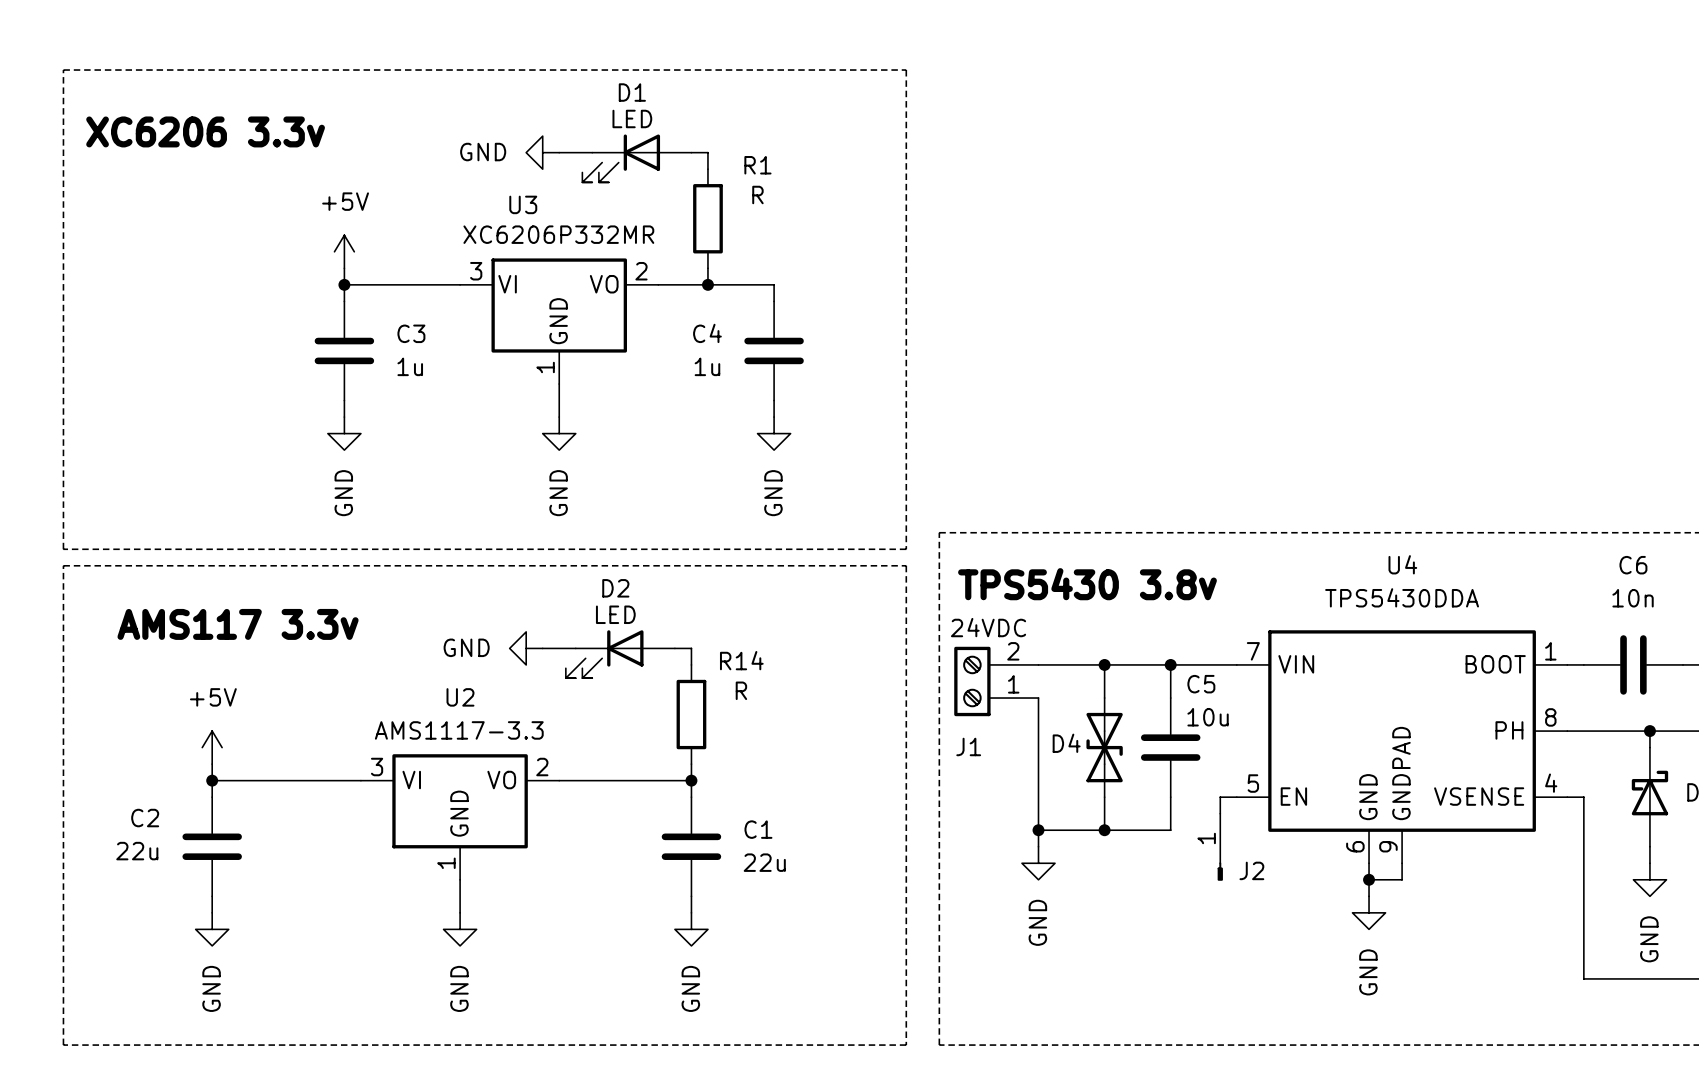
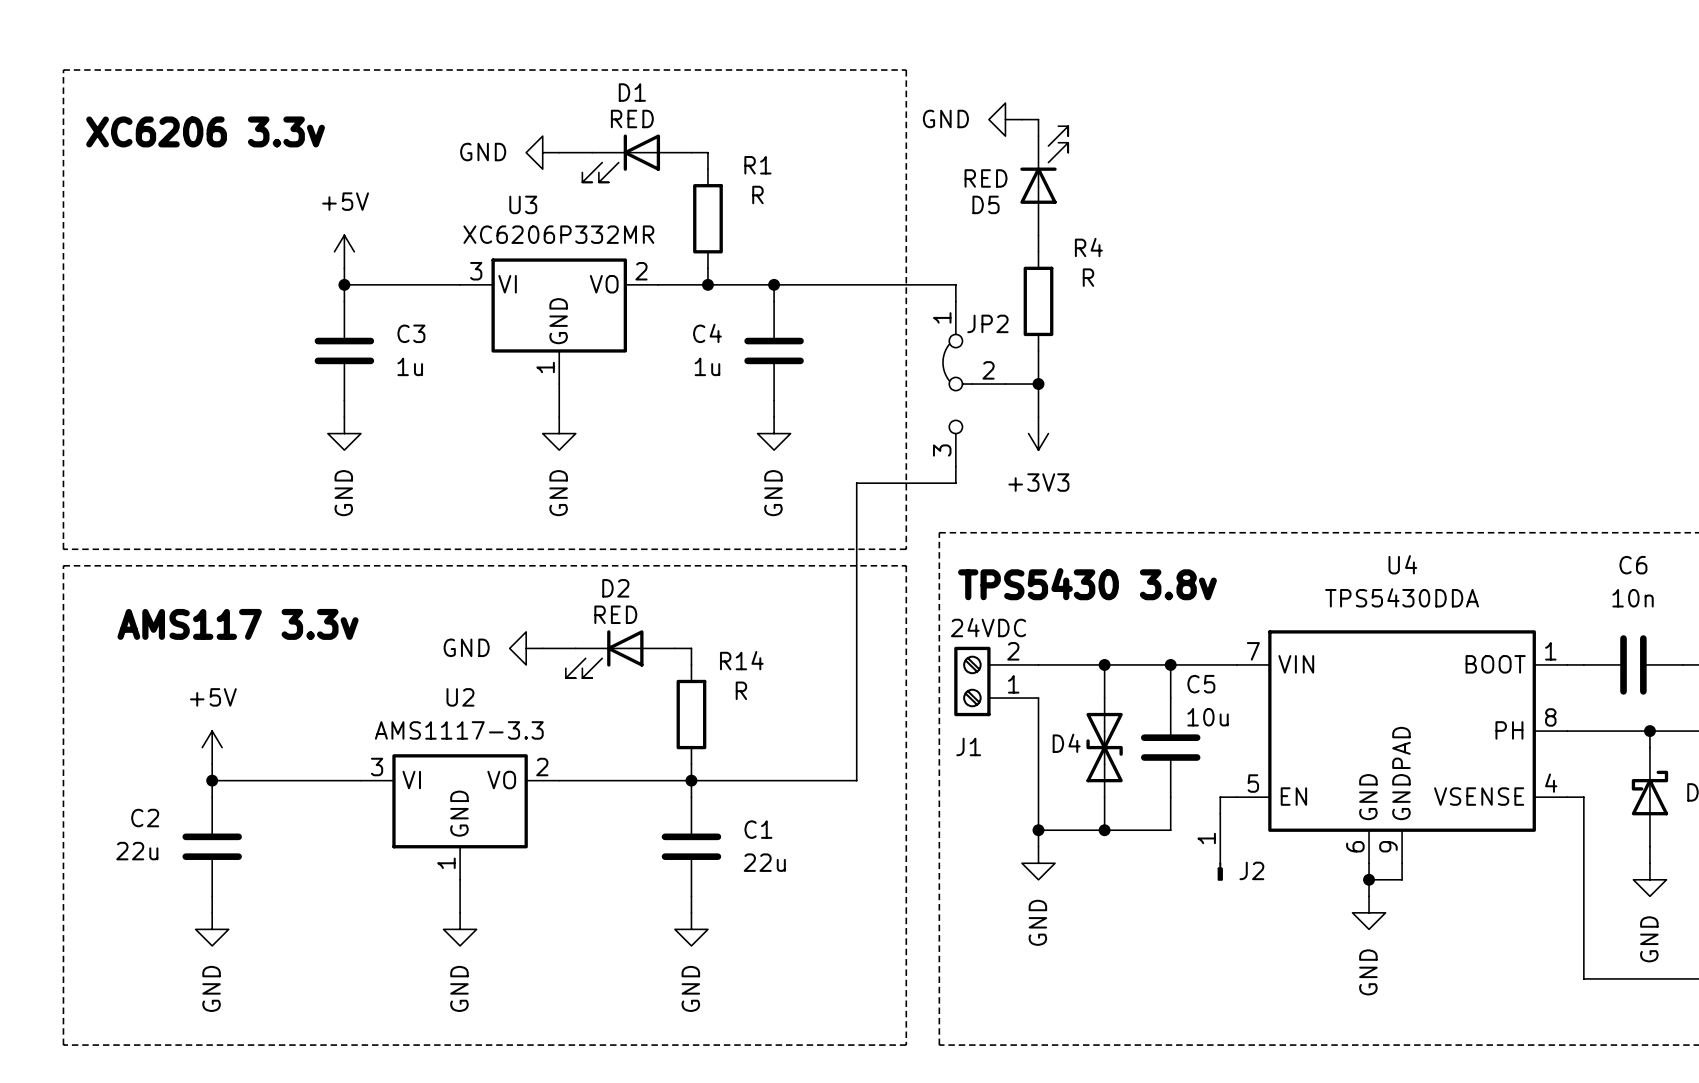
D1 value: LED (632, 118) -> RED (632, 118)
power symbol: none -> GND (1005, 119)
wire: none -> (1021, 119) (1038, 119) (1038, 136)
D5: none -> RED (1044, 180)
wire: none -> (1038, 235) (1038, 251)
wire: none -> (774, 284) (955, 284) (955, 301)
junction: none -> (774, 284)
R4: none -> R (1038, 301)
wire: none -> (1038, 350) (1038, 417)
JP2: none -> (974, 384)
wire: none -> (1005, 384) (1038, 384)
junction: none -> (1038, 384)
power symbol: none -> +3V3 (1038, 433)
wire: none -> (955, 466) (955, 483) (856, 483) (856, 780) (691, 780)
D2 value: LED (615, 614) -> RED (615, 614)

